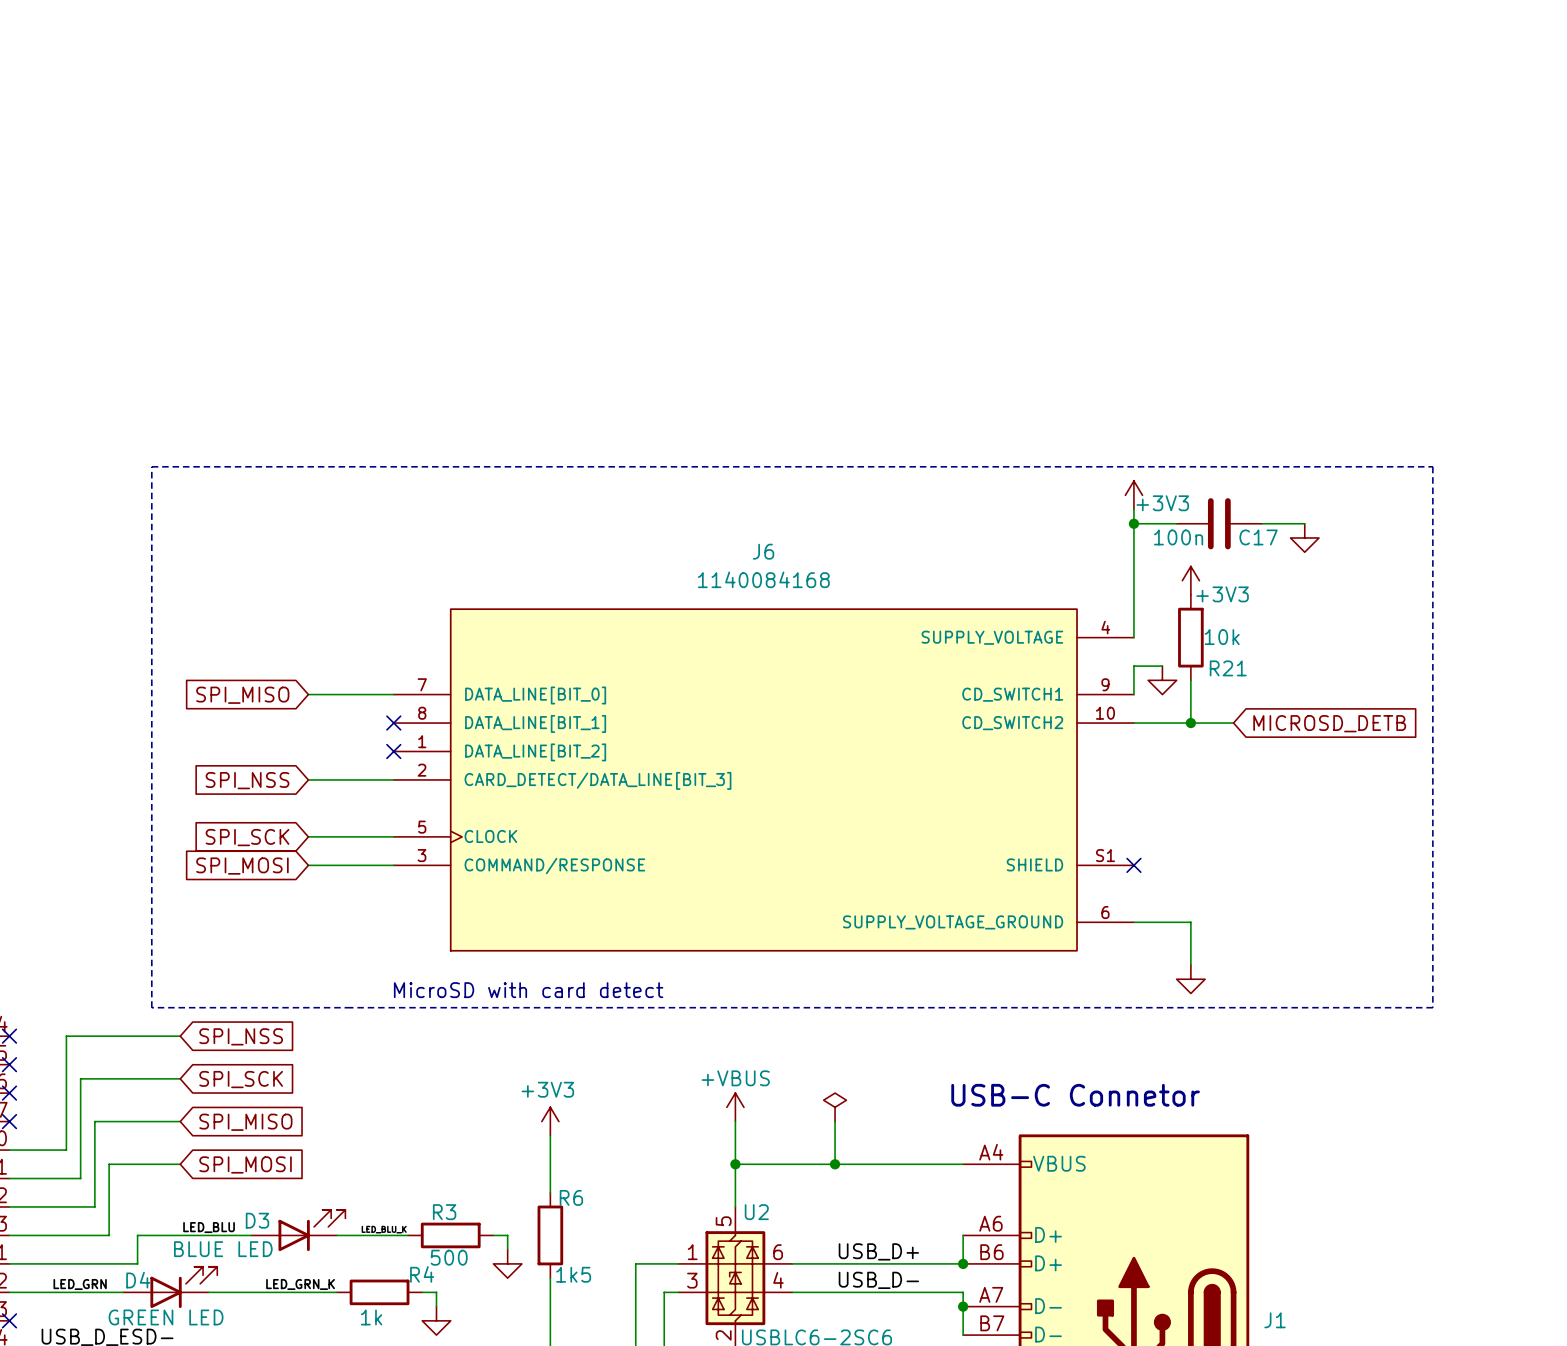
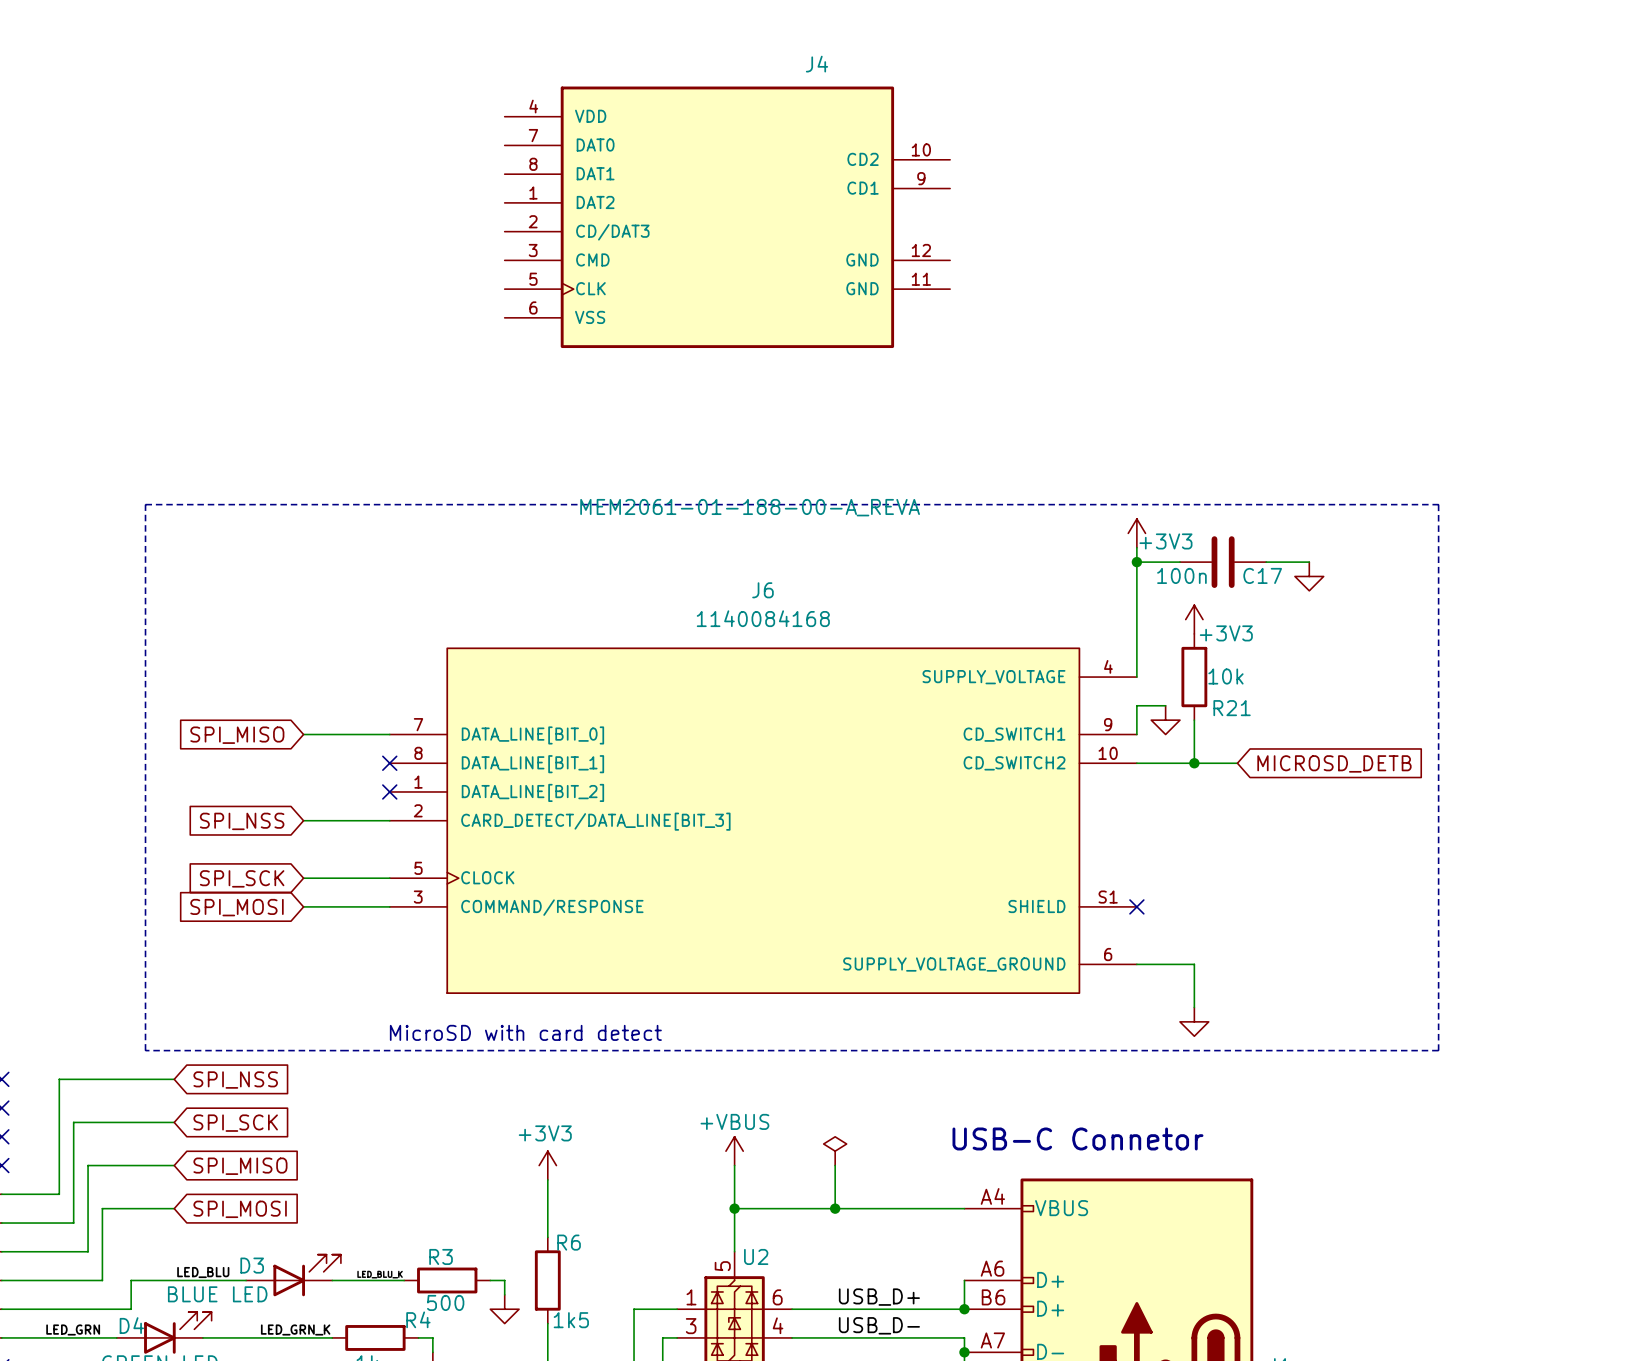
J4: none -> MEM2061-01-188-00-A_REVA (727, 217)

